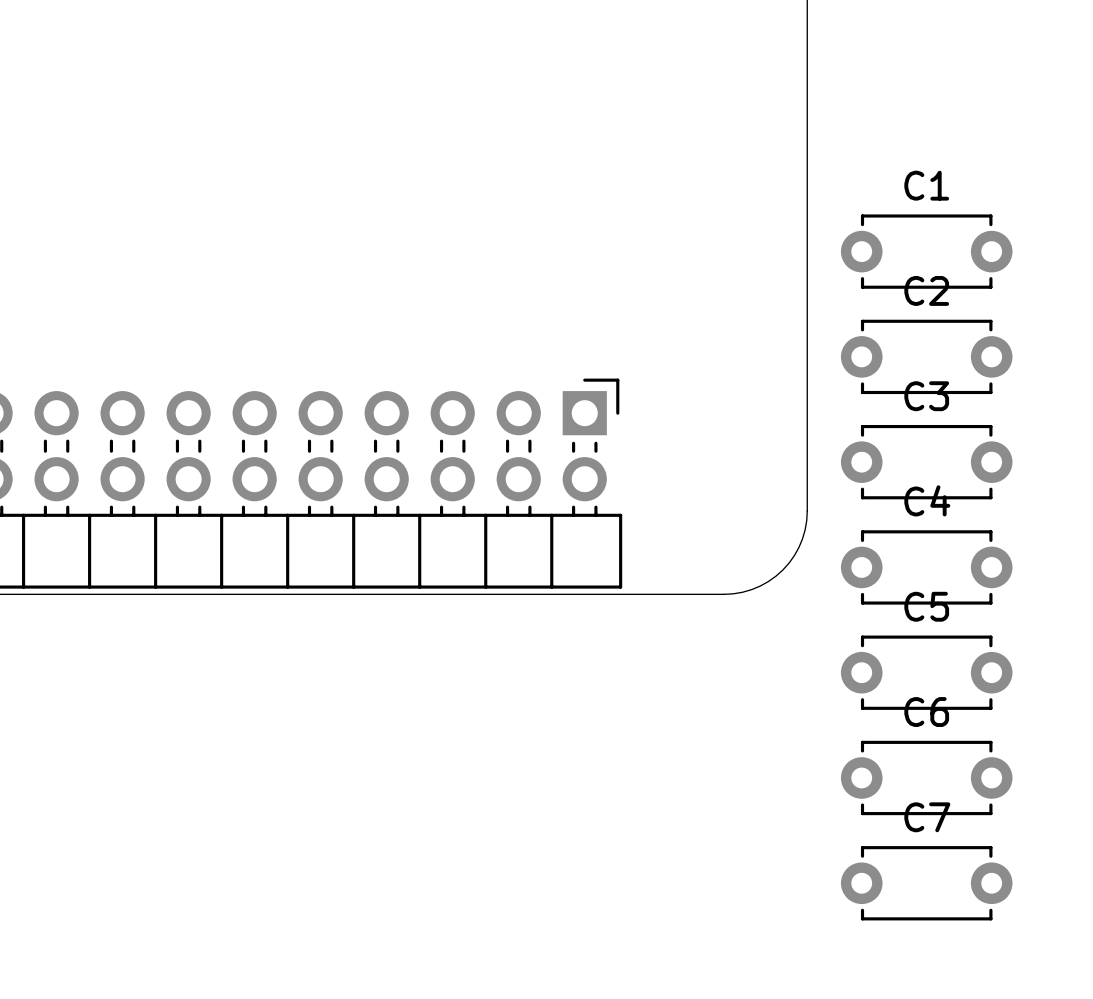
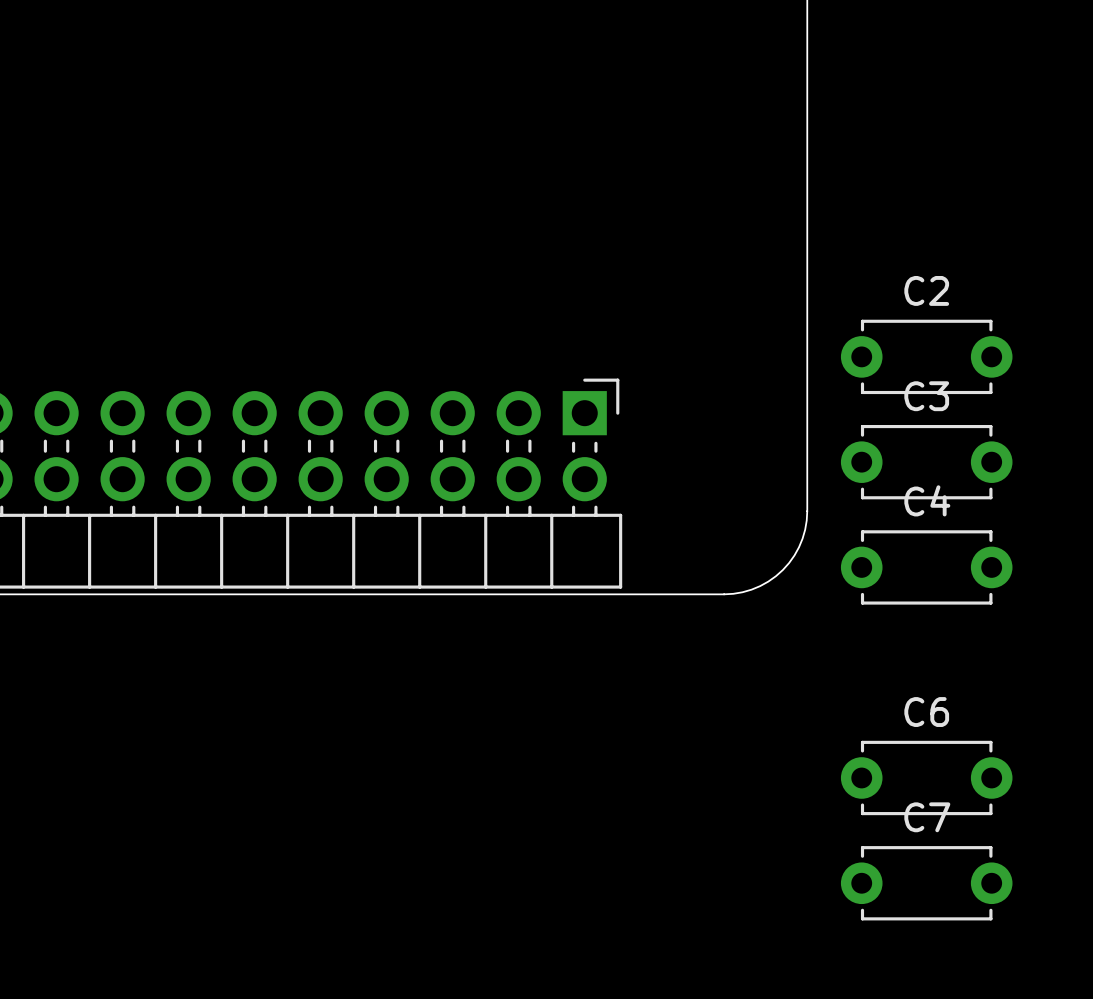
C1: (926, 251) -> none
C5: (926, 672) -> none

